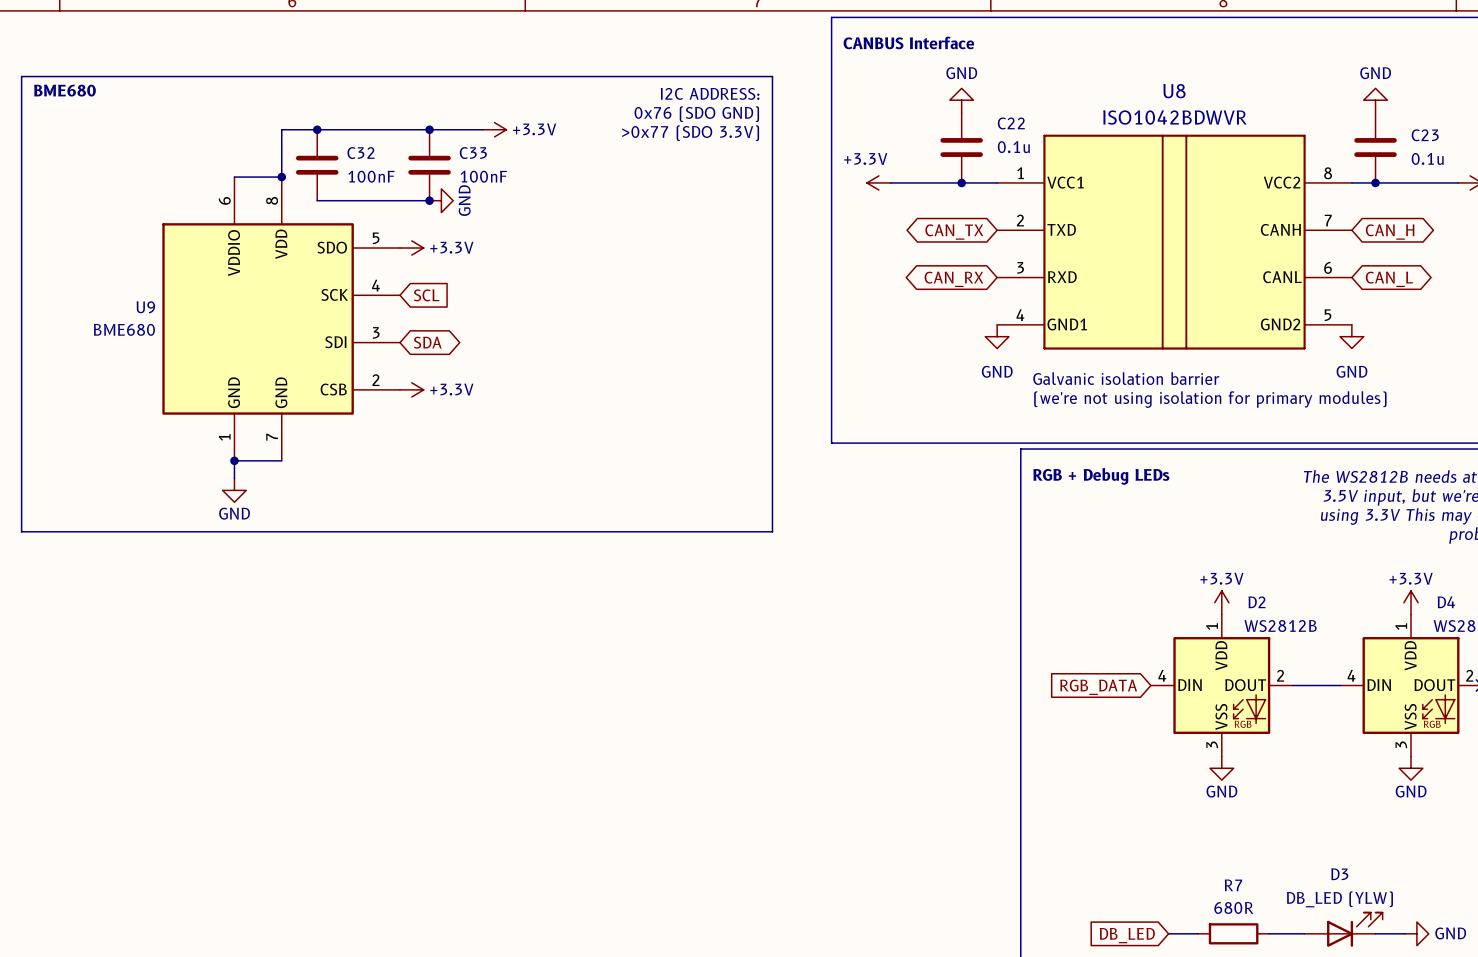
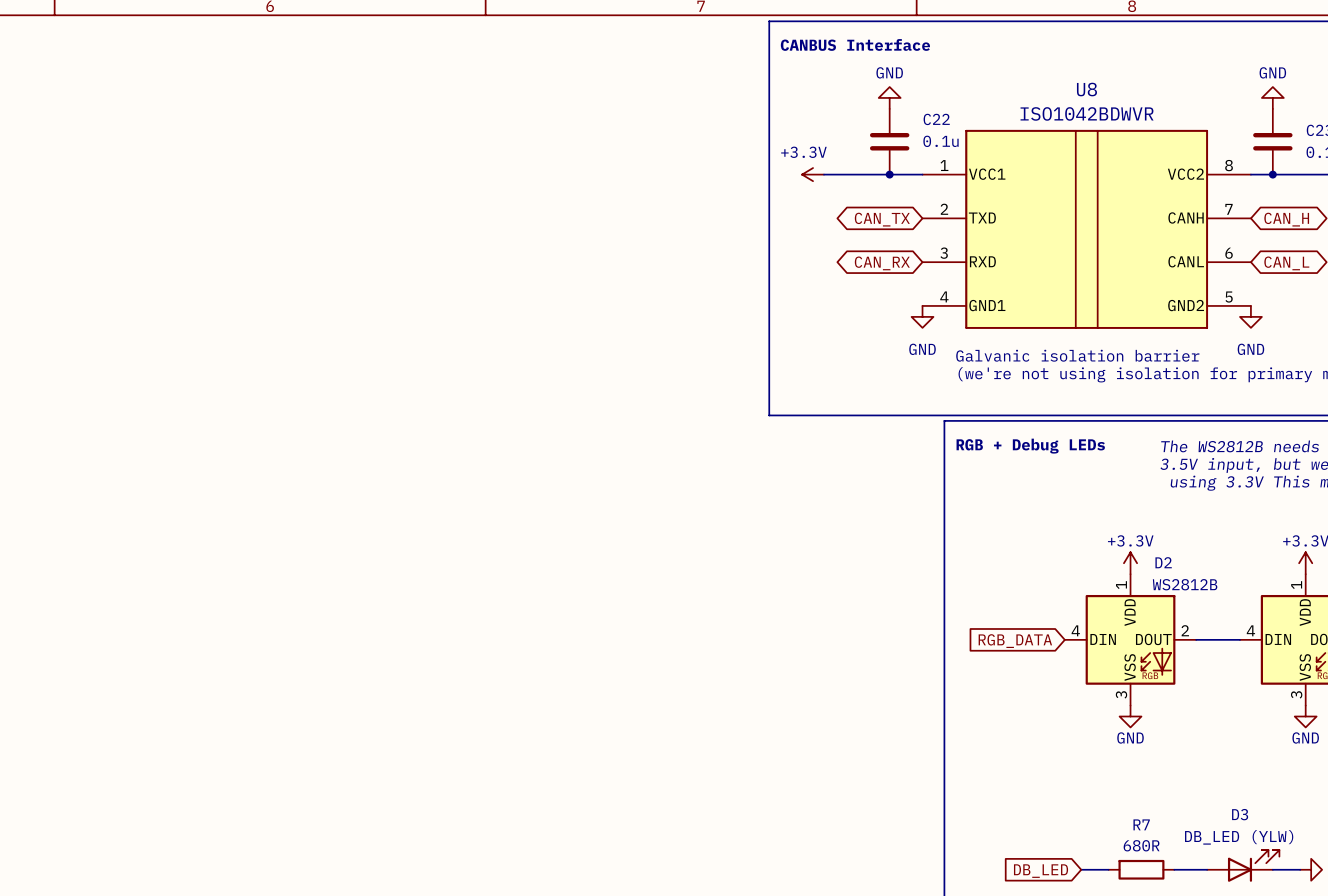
line: (21, 76) (772, 76) (772, 531) (21, 531) (21, 76) -> none
text: BME680 (64, 90) -> none
text: I2C ADDRESS: (710, 93) -> none
text: 0x76 (SDO GND) (696, 114) -> none
junction: (317, 129) -> none
junction: (429, 129) -> none
wire: (482, 129) (281, 129) (281, 177) (234, 177) -> none
power symbol: +3.3V (494, 129) -> none
text: >0x77 (SDO 3.3V) (690, 133) -> none
C32: 100nF (317, 165) -> none
C33: 100nF (429, 165) -> none
junction: (281, 177) -> none
wire: (317, 200) (429, 200) -> none
junction: (429, 200) -> none
power symbol: GND (441, 200) -> none
power symbol: +3.3V (411, 248) -> none
global label: SCL (426, 295) -> none
U9: BME680 (281, 318) -> none
global label: SDA (427, 342) -> none
power symbol: +3.3V (411, 389) -> none
junction: (234, 460) -> none
wire: (281, 460) (234, 460) (234, 478) -> none
power symbol: GND (234, 490) -> none

